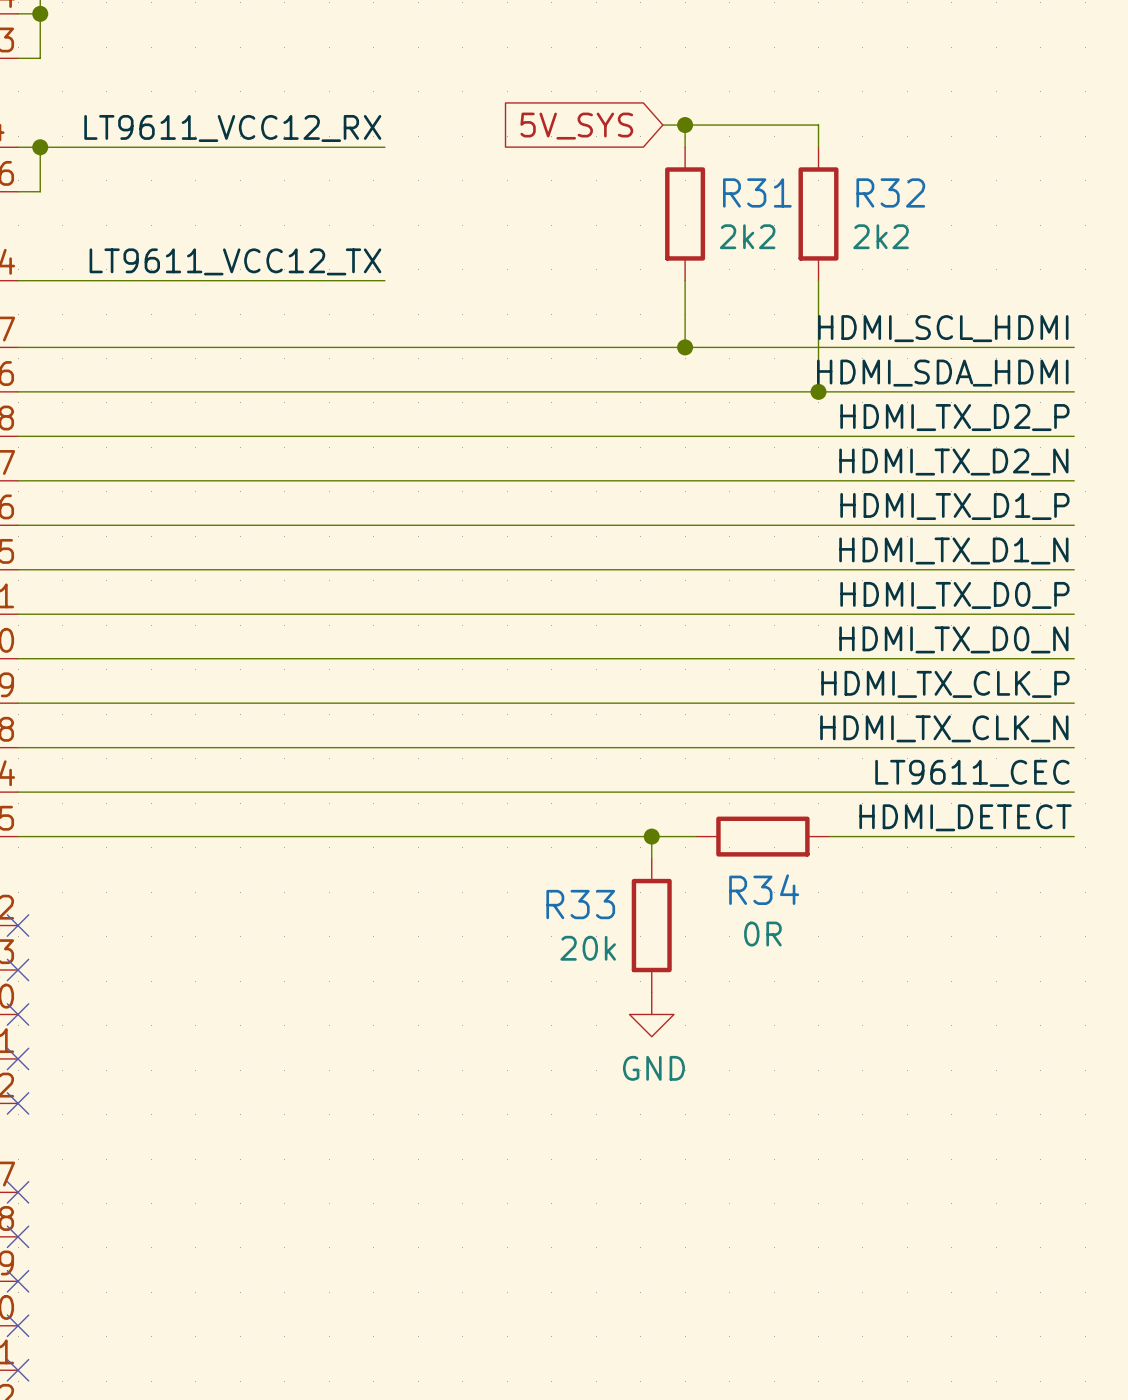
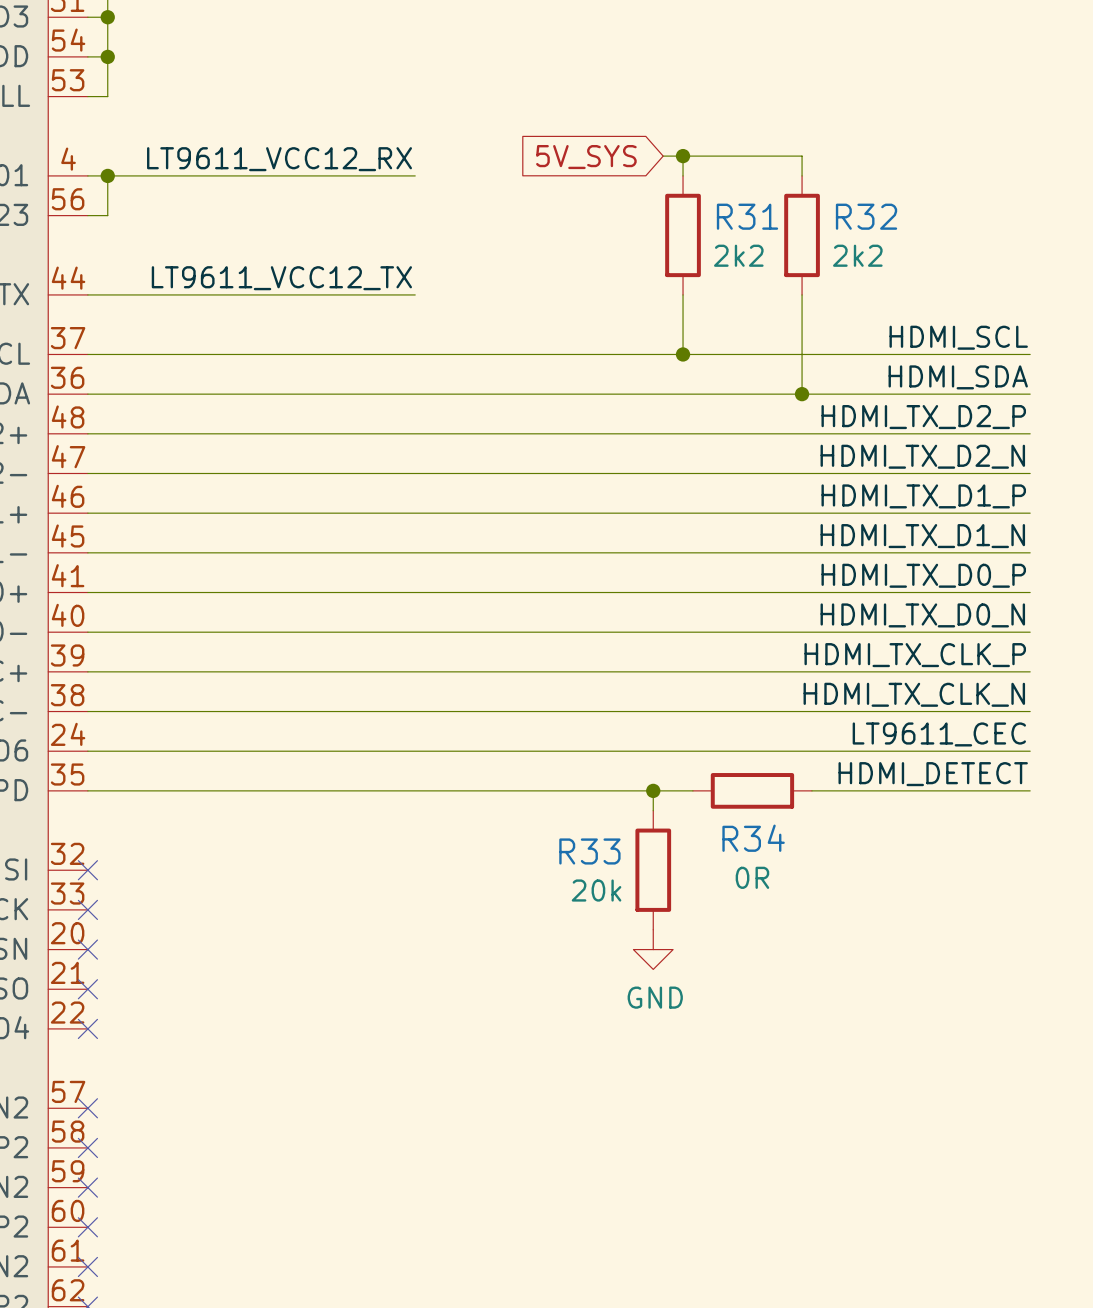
label: HDMI_SCL_HDMI (943, 328) -> HDMI_SCL (958, 337)
label: HDMI_SDA_HDMI (942, 373) -> HDMI_SDA (958, 377)

